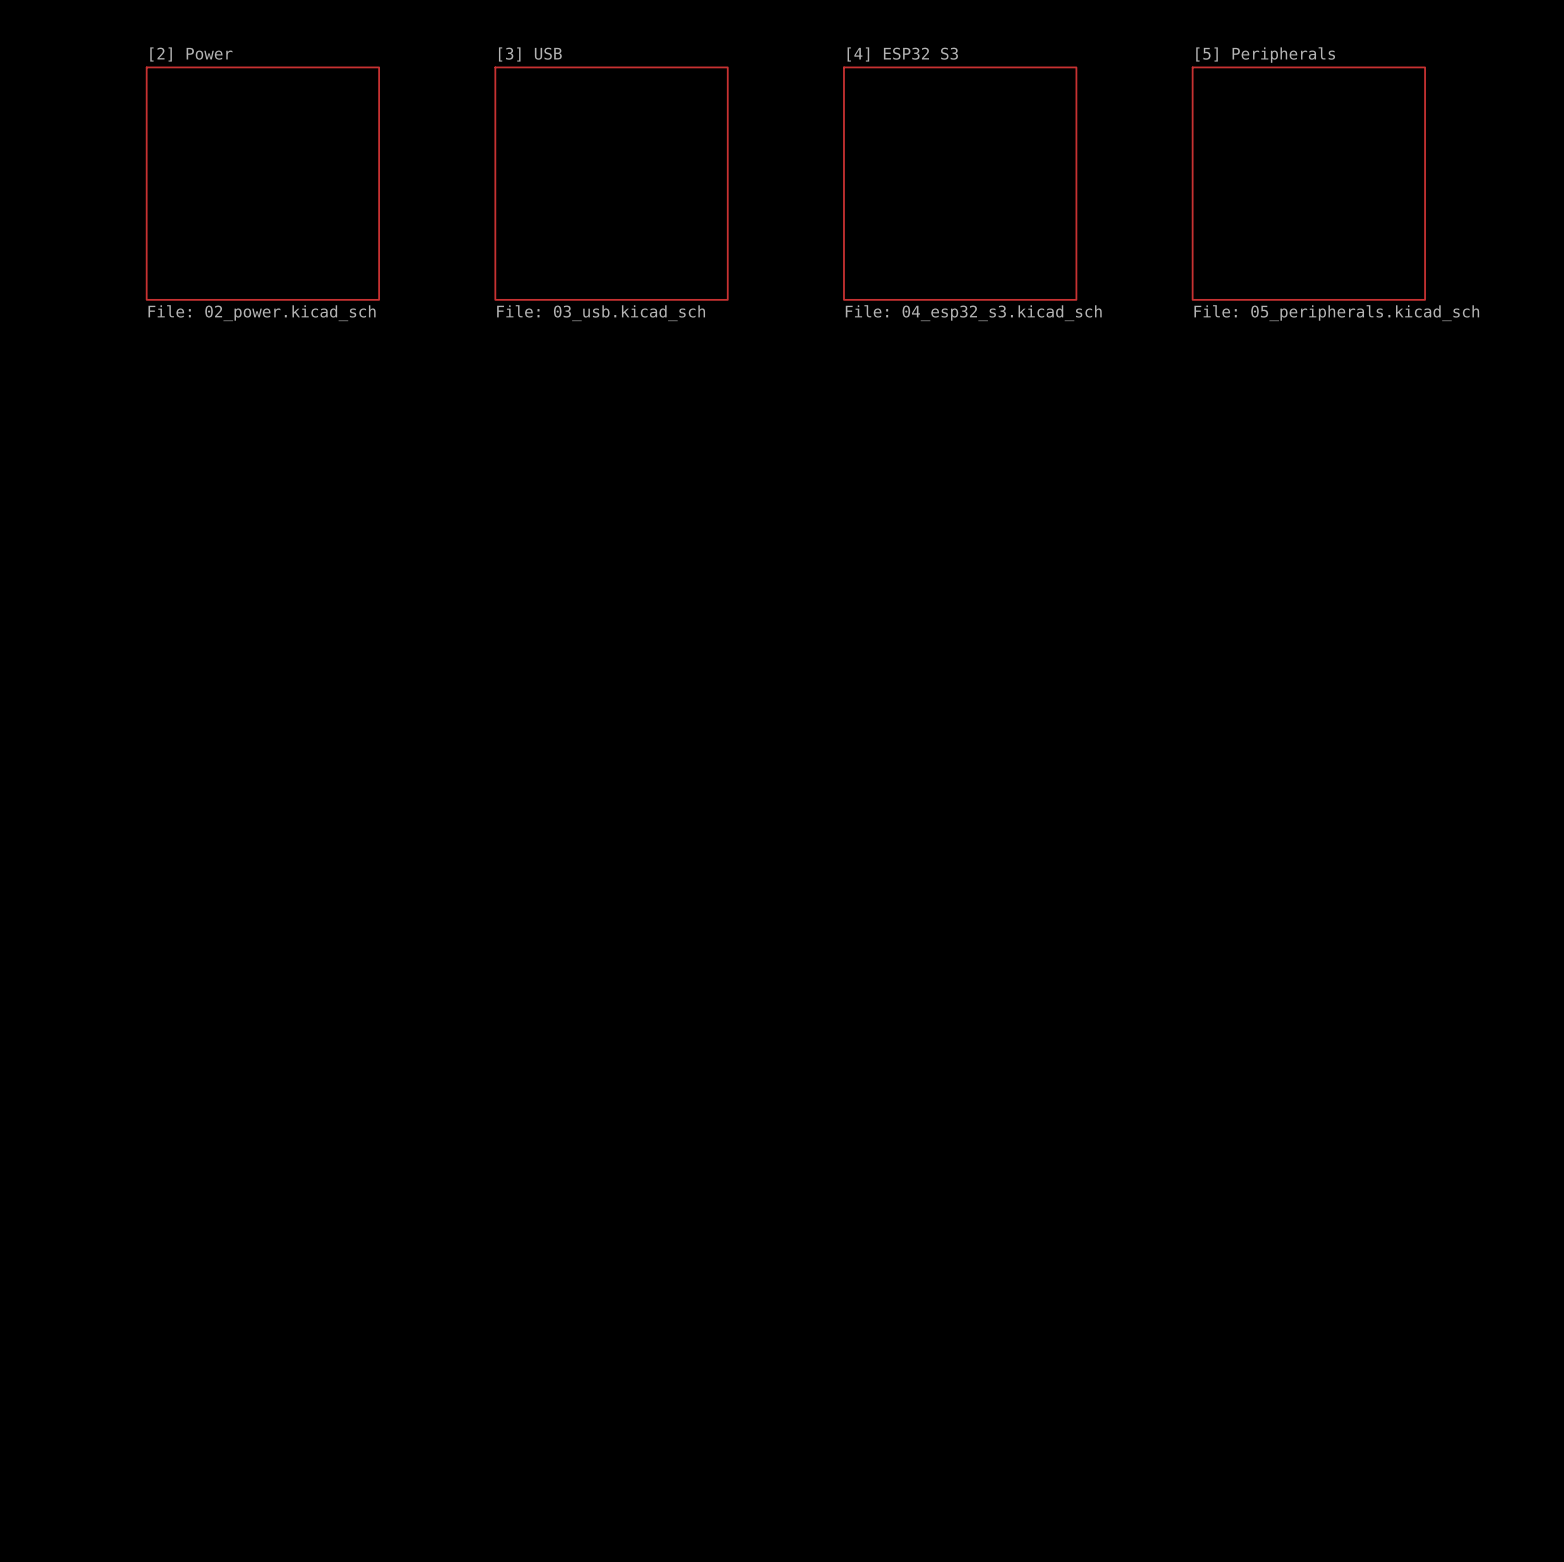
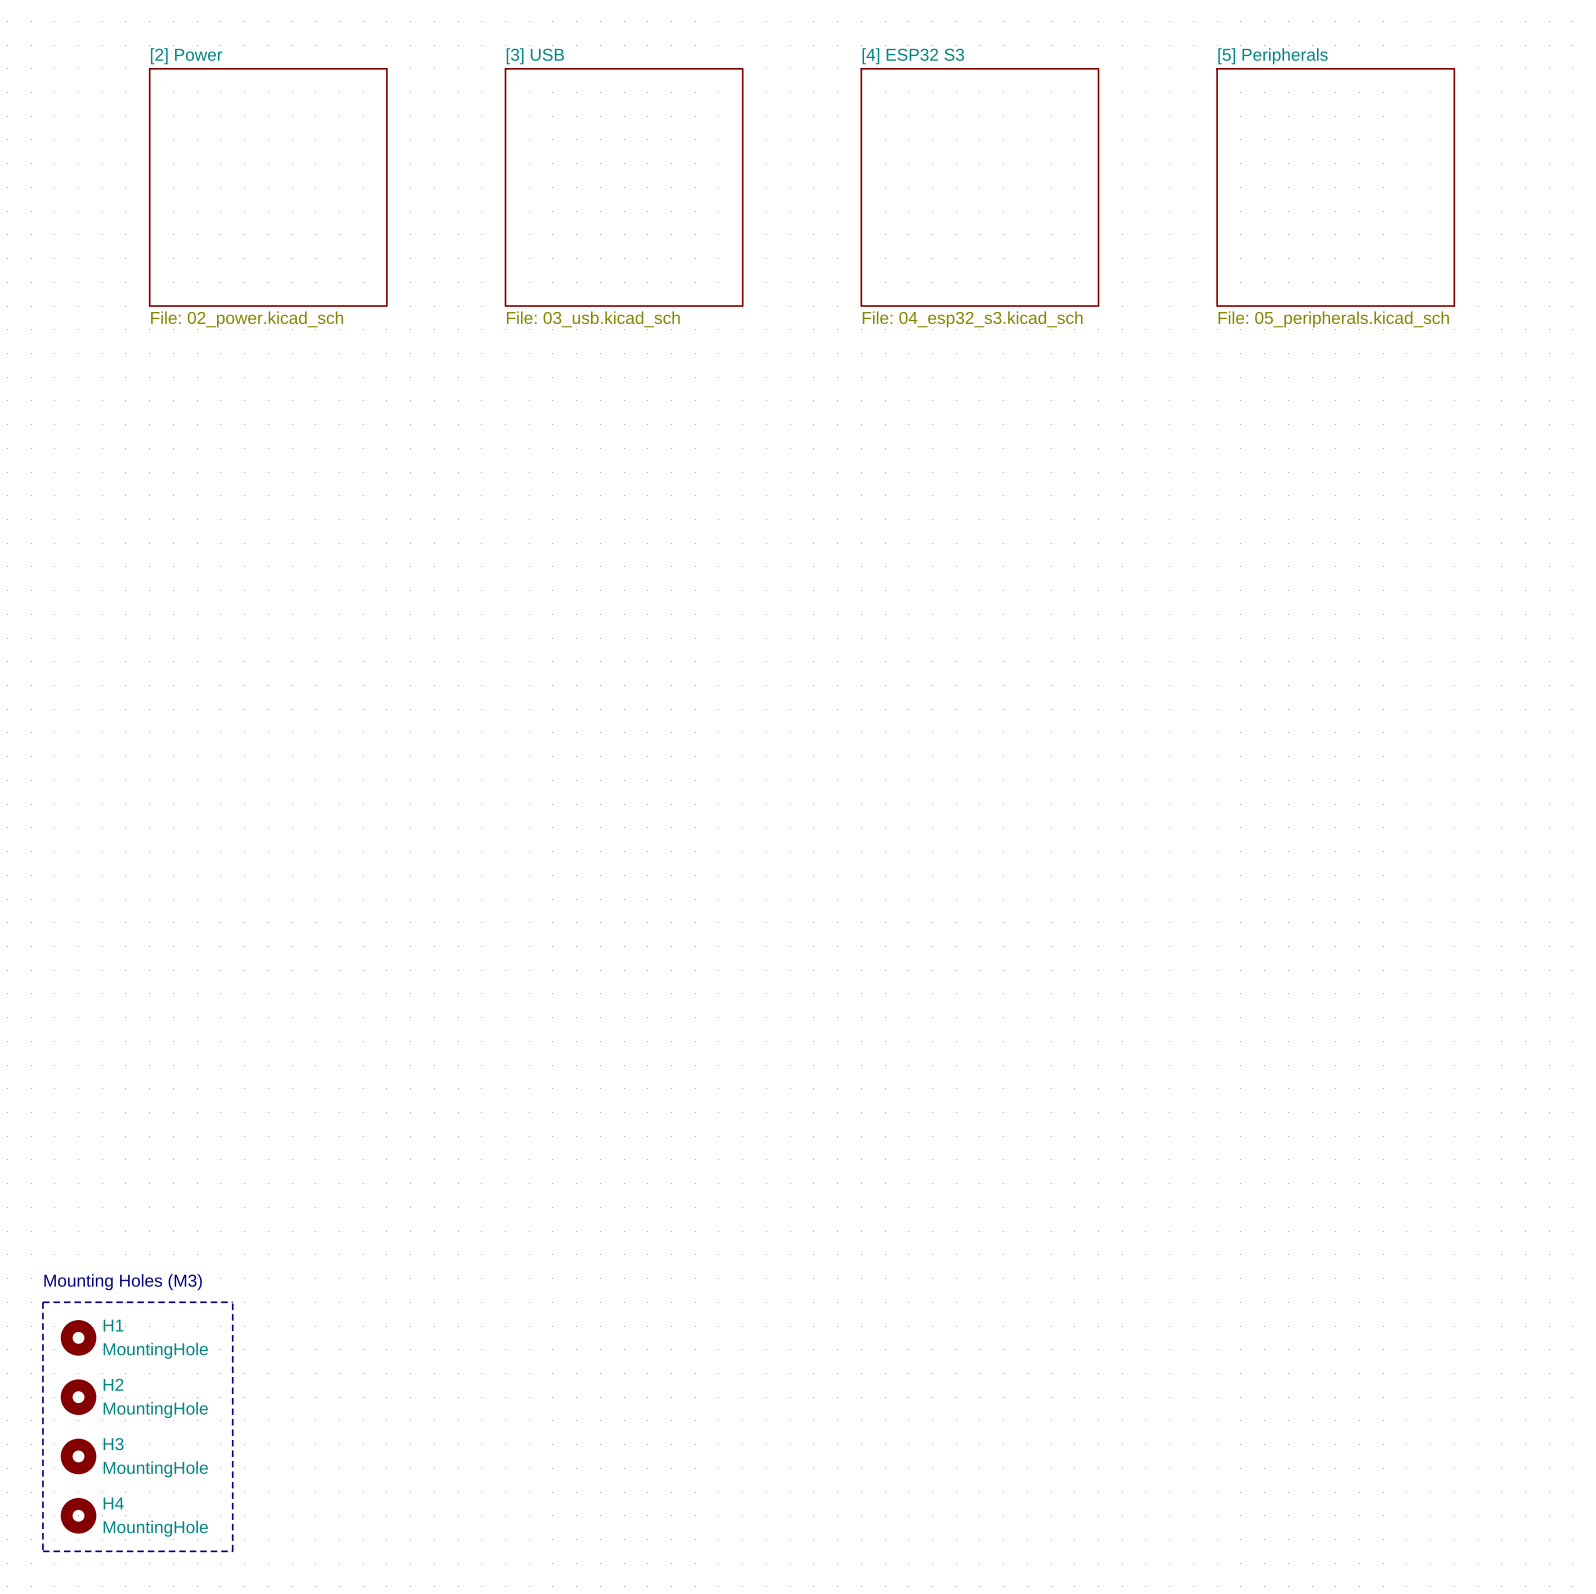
text: none -> Mounting Holes (M3) (123, 1282)
line: none -> (42, 1302) (232, 1302) (232, 1551) (42, 1551) (42, 1302)
H1: none -> MountingHole (78, 1337)
H2: none -> MountingHole (78, 1397)
H3: none -> MountingHole (78, 1456)
H4: none -> MountingHole (78, 1515)

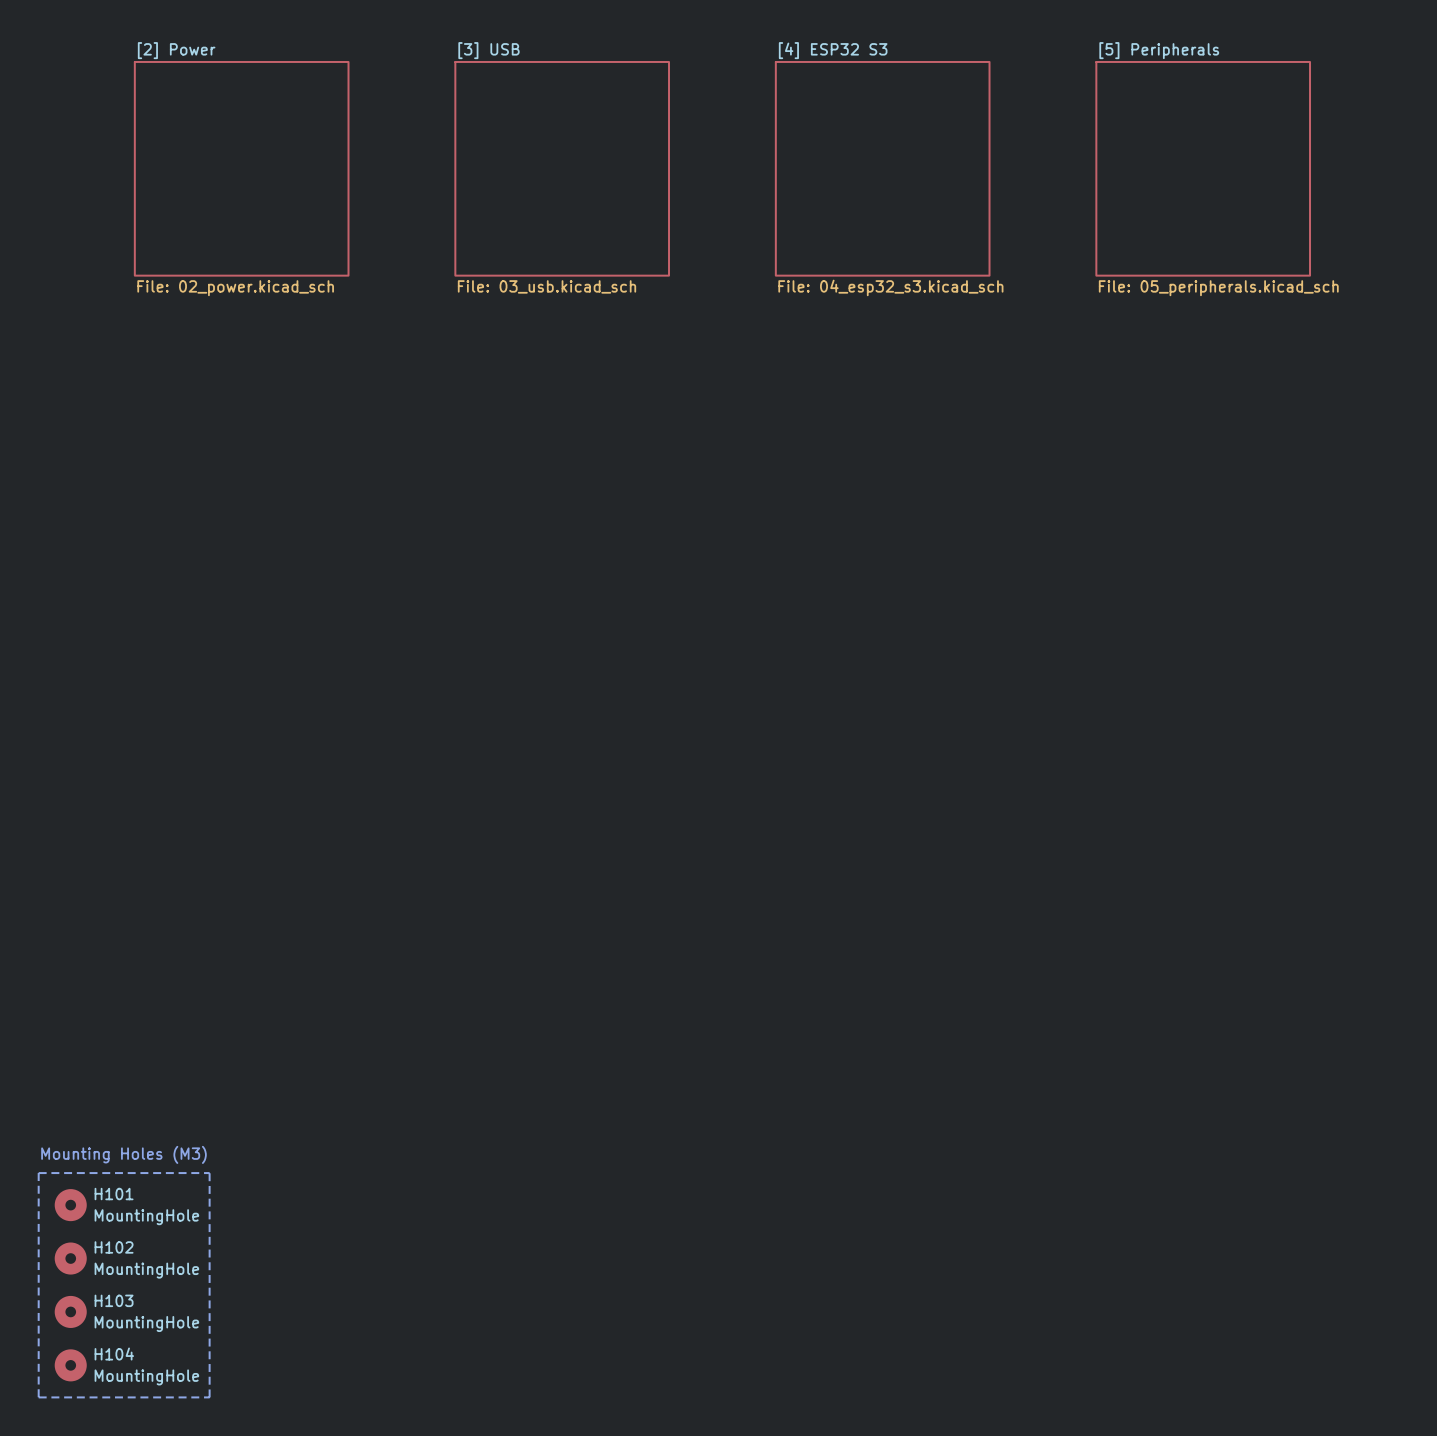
H1 name: H1 (113, 1325) -> H101 (114, 1194)
H2 name: H2 (113, 1384) -> H102 (114, 1247)
H3 name: H3 (113, 1444) -> H103 (114, 1300)
H4 name: H4 (113, 1503) -> H104 (114, 1354)

